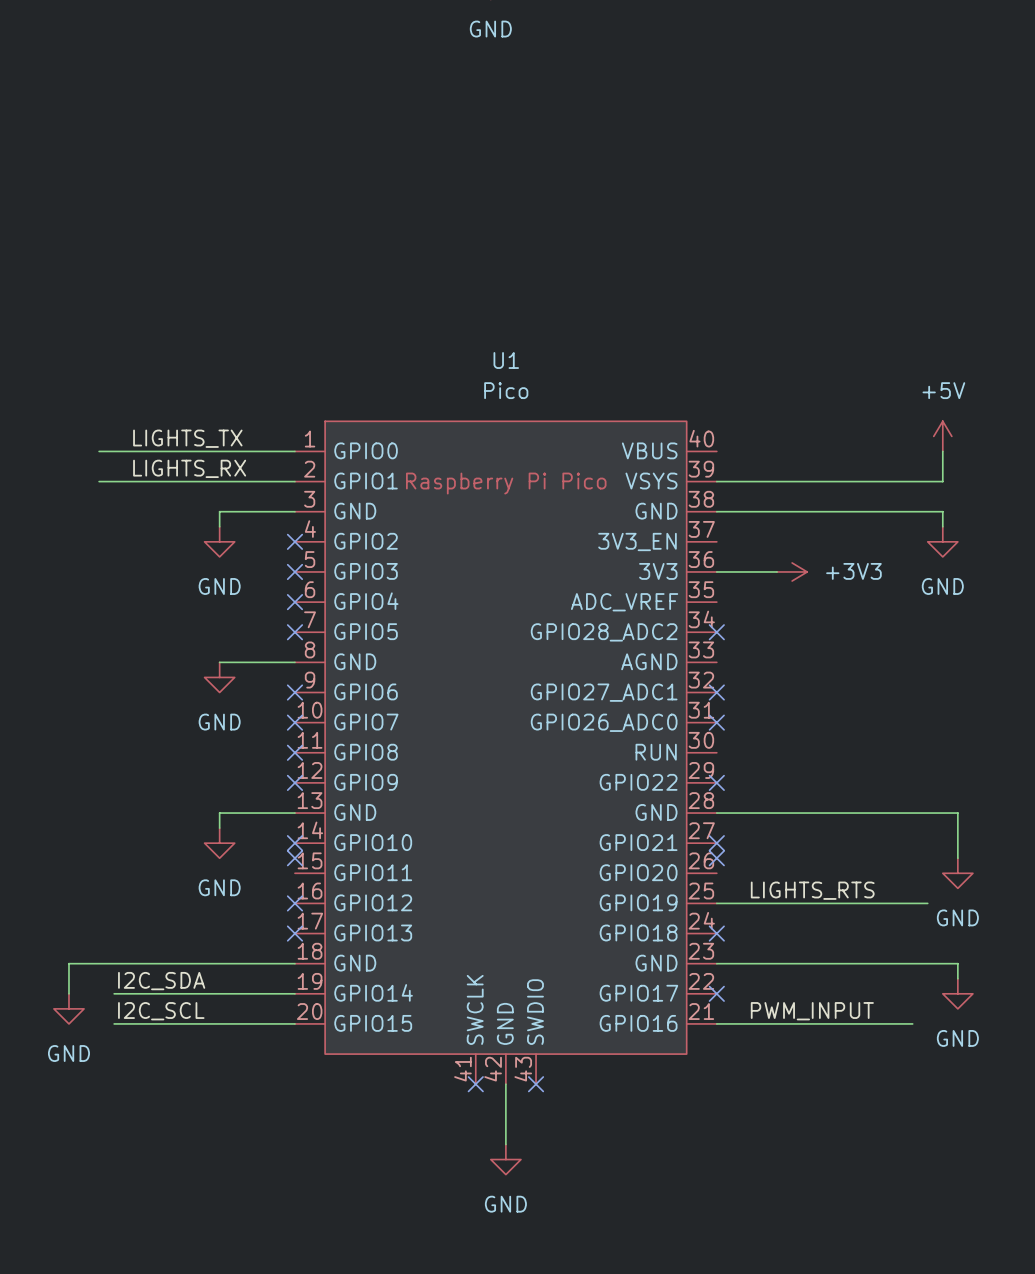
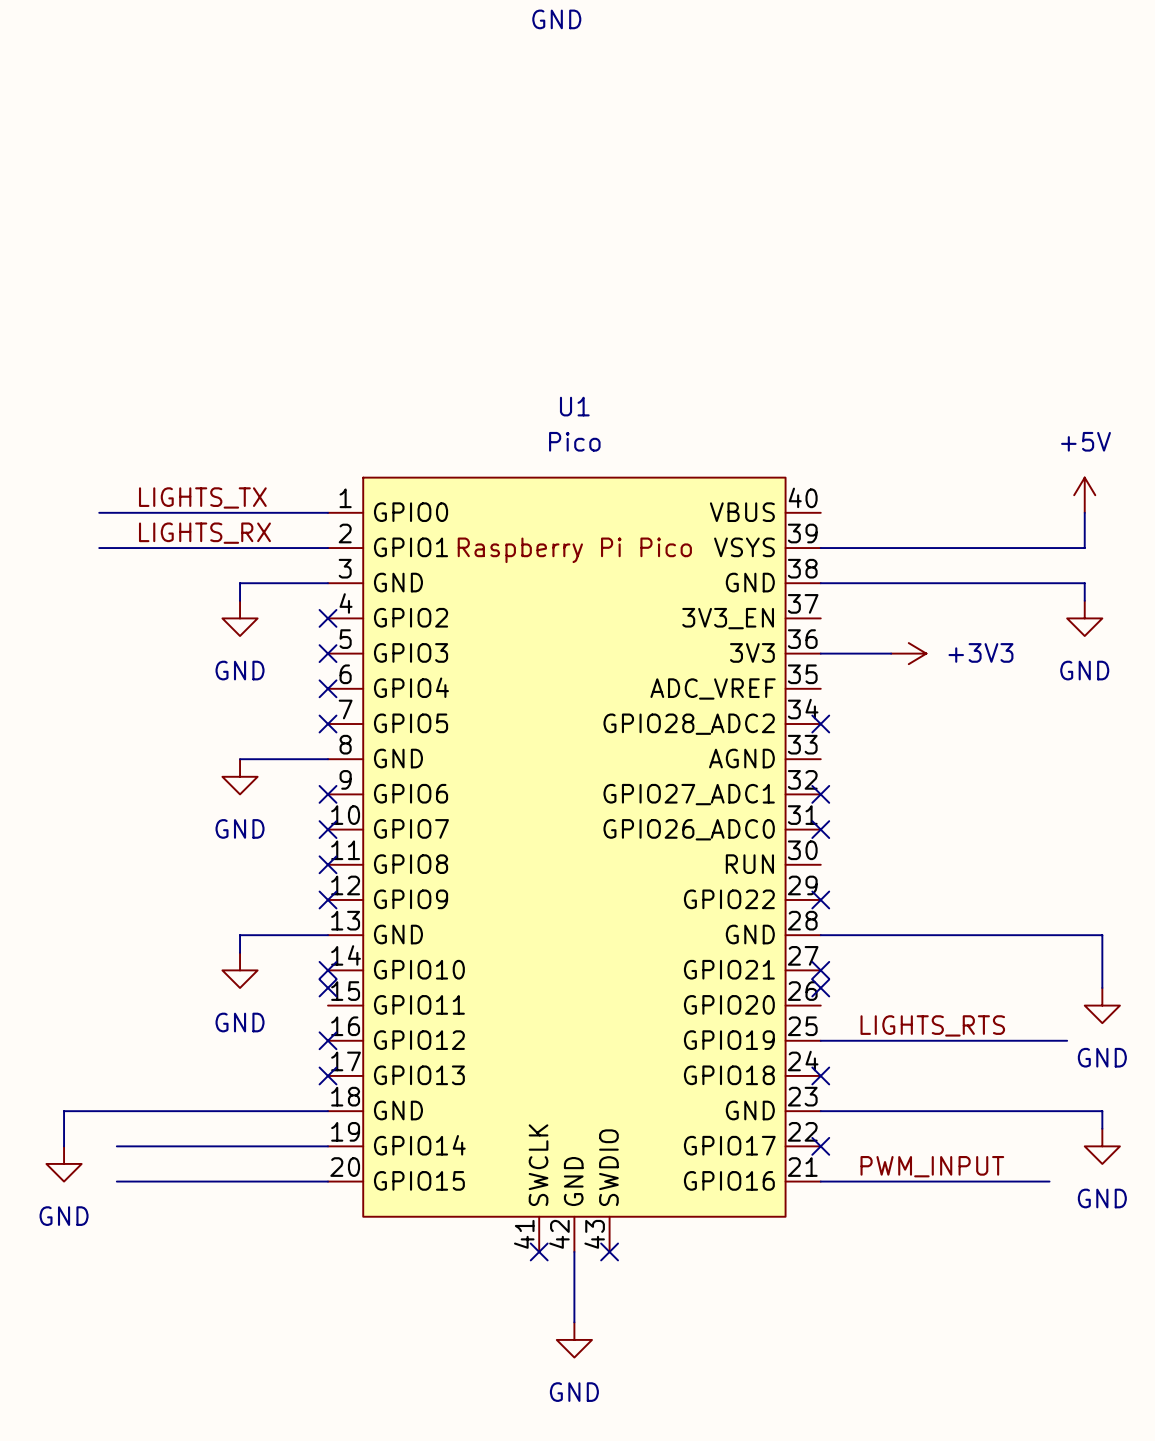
label: I2C_SDA (161, 981) -> none
label: I2C_SCL (161, 1011) -> none

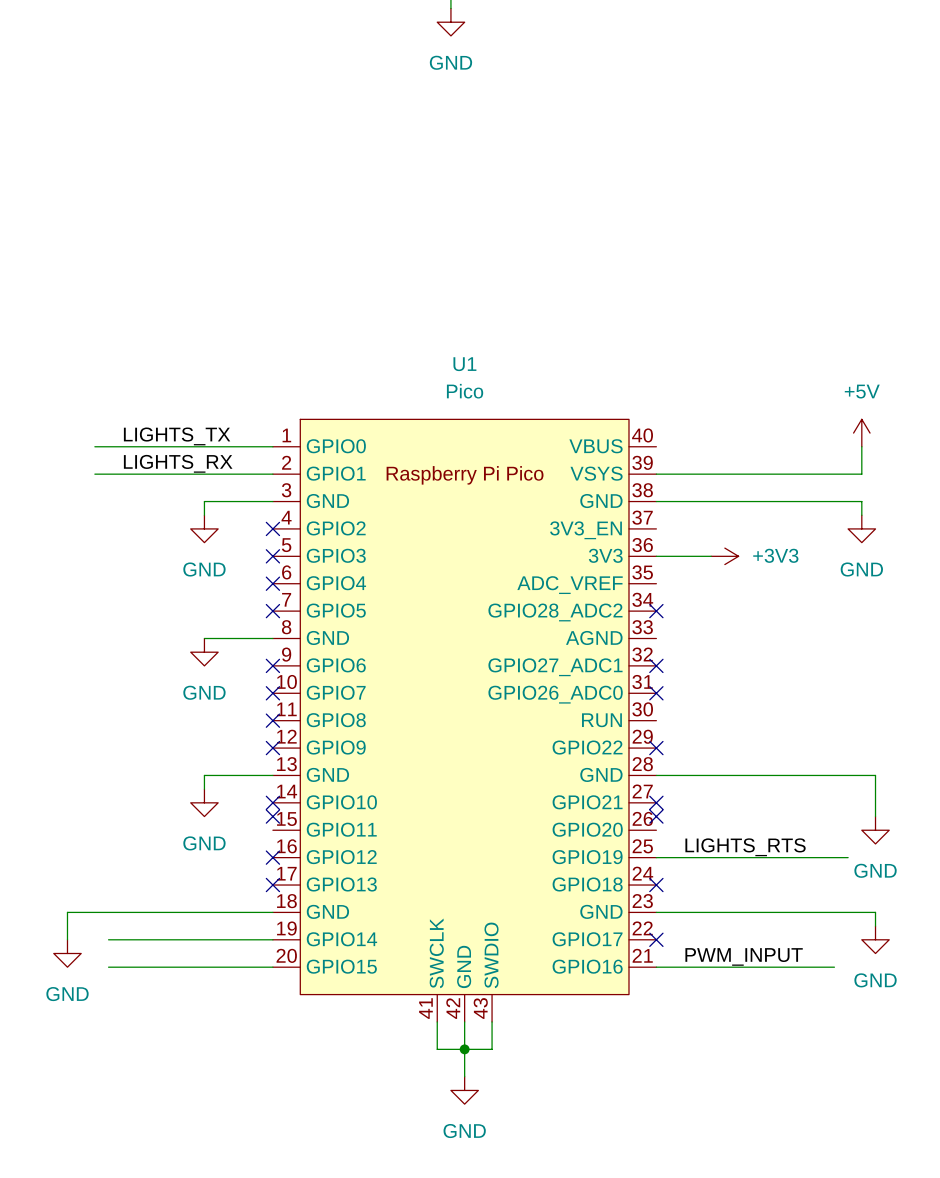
wire: none -> (437, 1021) (437, 1049) (492, 1049) (492, 1021)
no-connect mark: (539, 1251) -> none
no-connect mark: (609, 1251) -> none
junction: none -> (464, 1049)

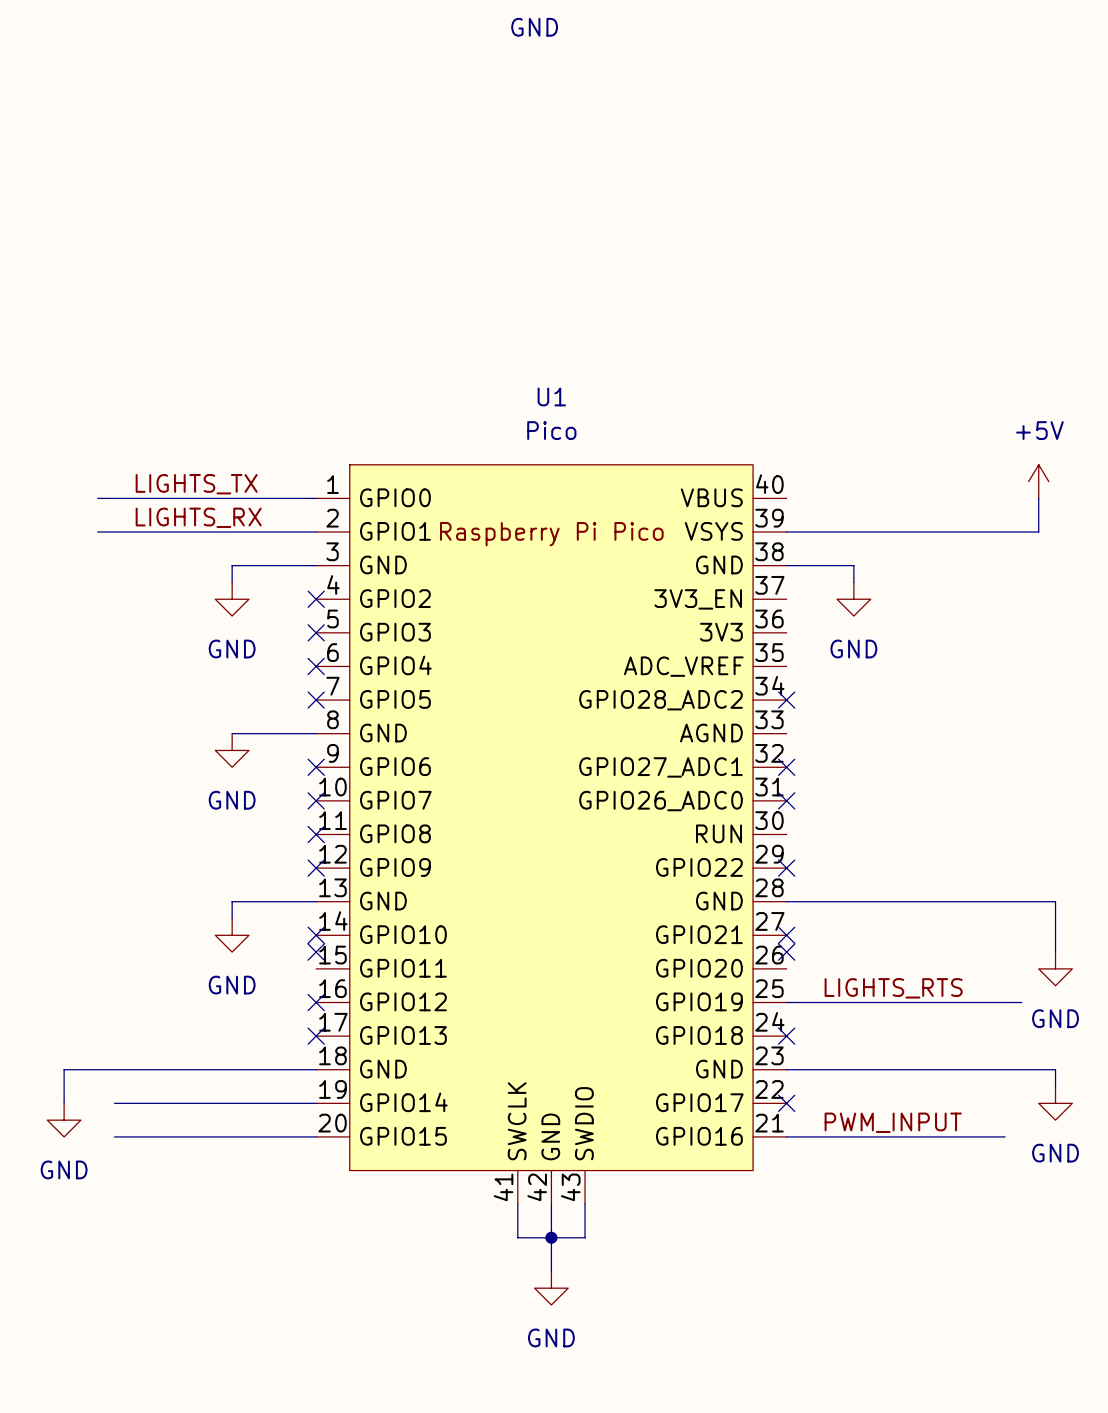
wire: (711, 501) (861, 501) (861, 515) -> (853, 565) (853, 582)
power symbol position: GND (861, 528) -> GND (853, 599)
wire: (656, 556) (711, 556) -> none
power symbol: +3V3 (724, 556) -> none

